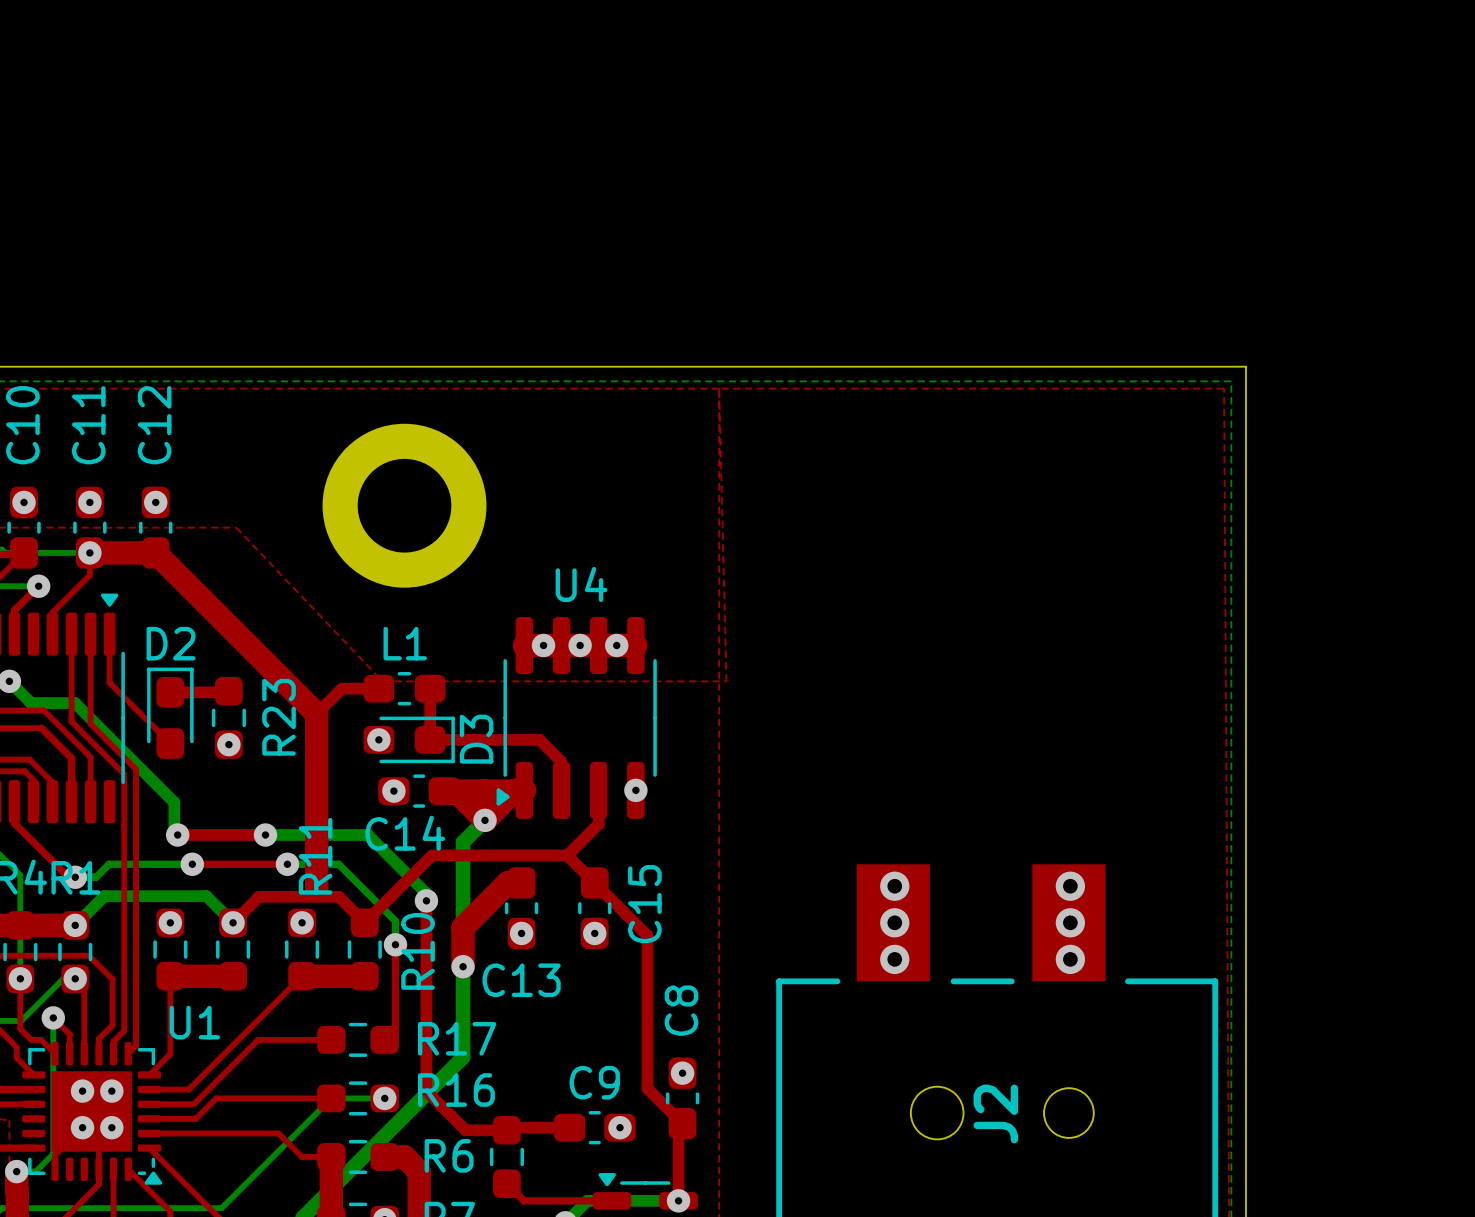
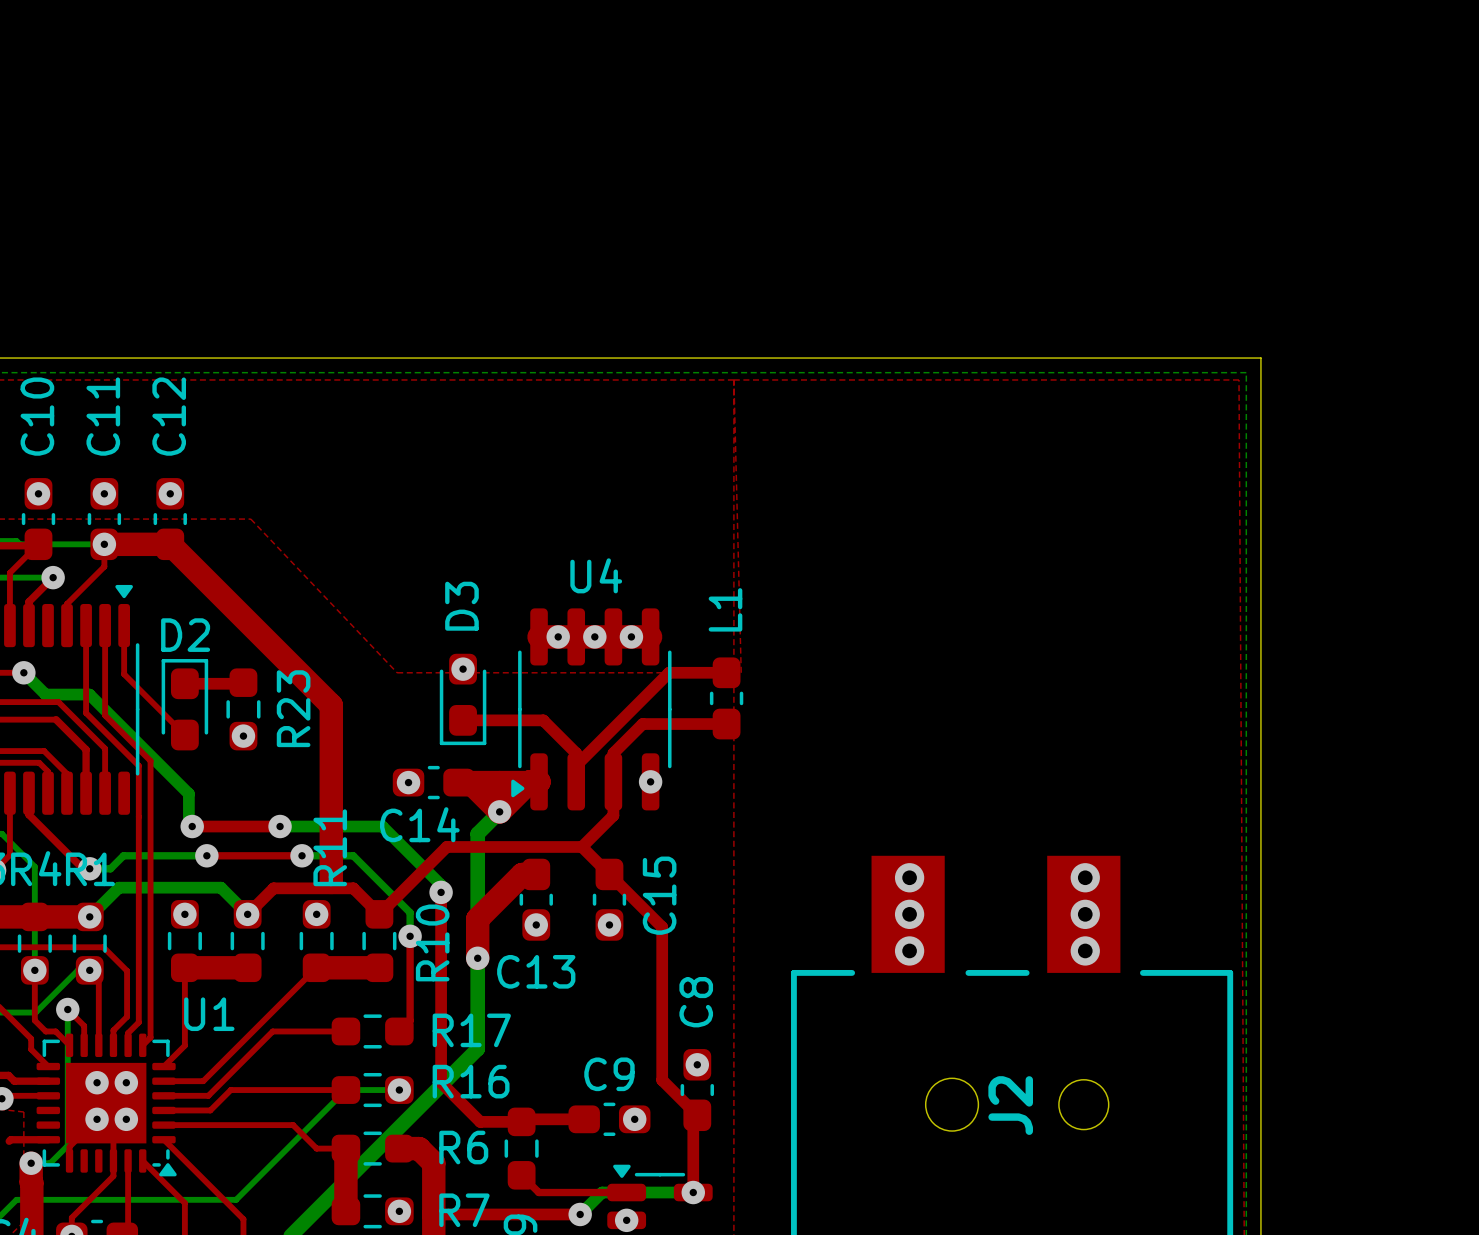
part: (404, 505) -> none
top track: none -> (726, 672) (669, 672) (576, 765)
top track: (378, 688) (341, 688) (316, 713) -> none
L1 rotation: 0° (404, 688) -> 90° clockwise (726, 698)
L1 position: (404, 688) -> (726, 698)
top track: (430, 688) (430, 739) (539, 739) -> (463, 720) (543, 720) (554, 731)
top track: none -> (726, 724) (642, 724) (613, 753) (613, 781)
via position: (378, 739) -> (463, 669)
D3 rotation: 0° (409, 739) -> 90° clockwise (463, 699)
D3 name position: D3 (476, 739) -> D3 (461, 606)

